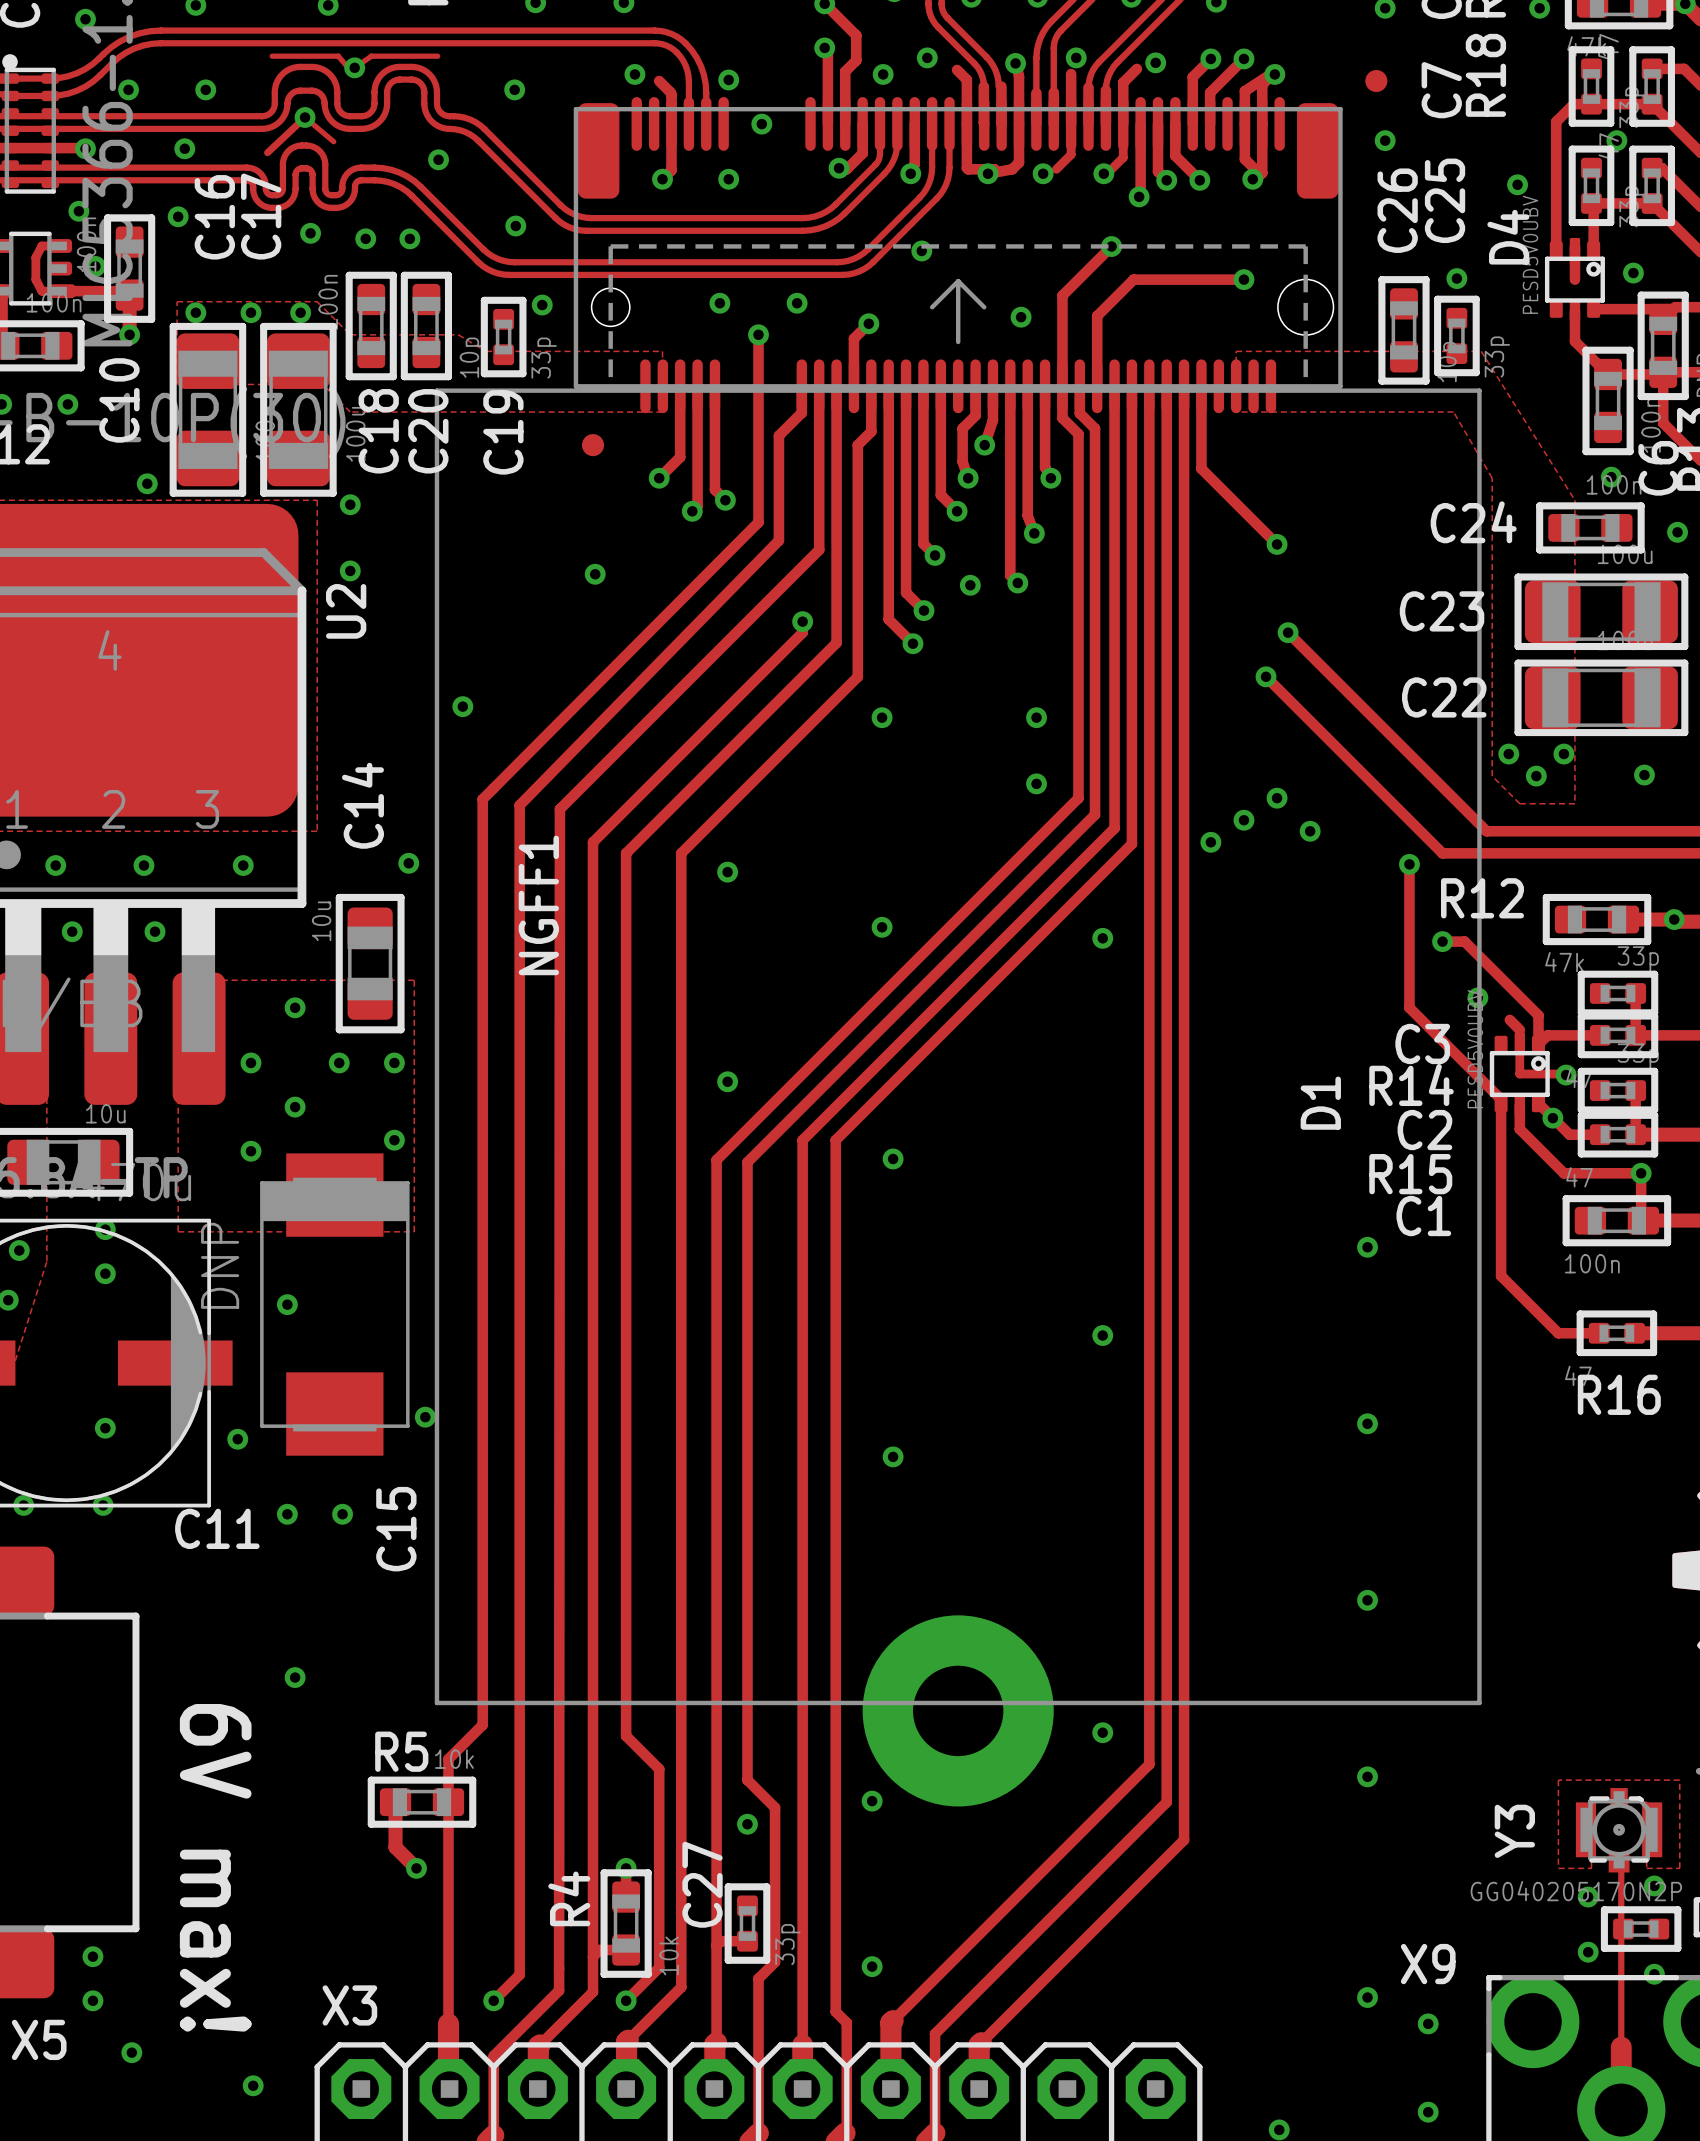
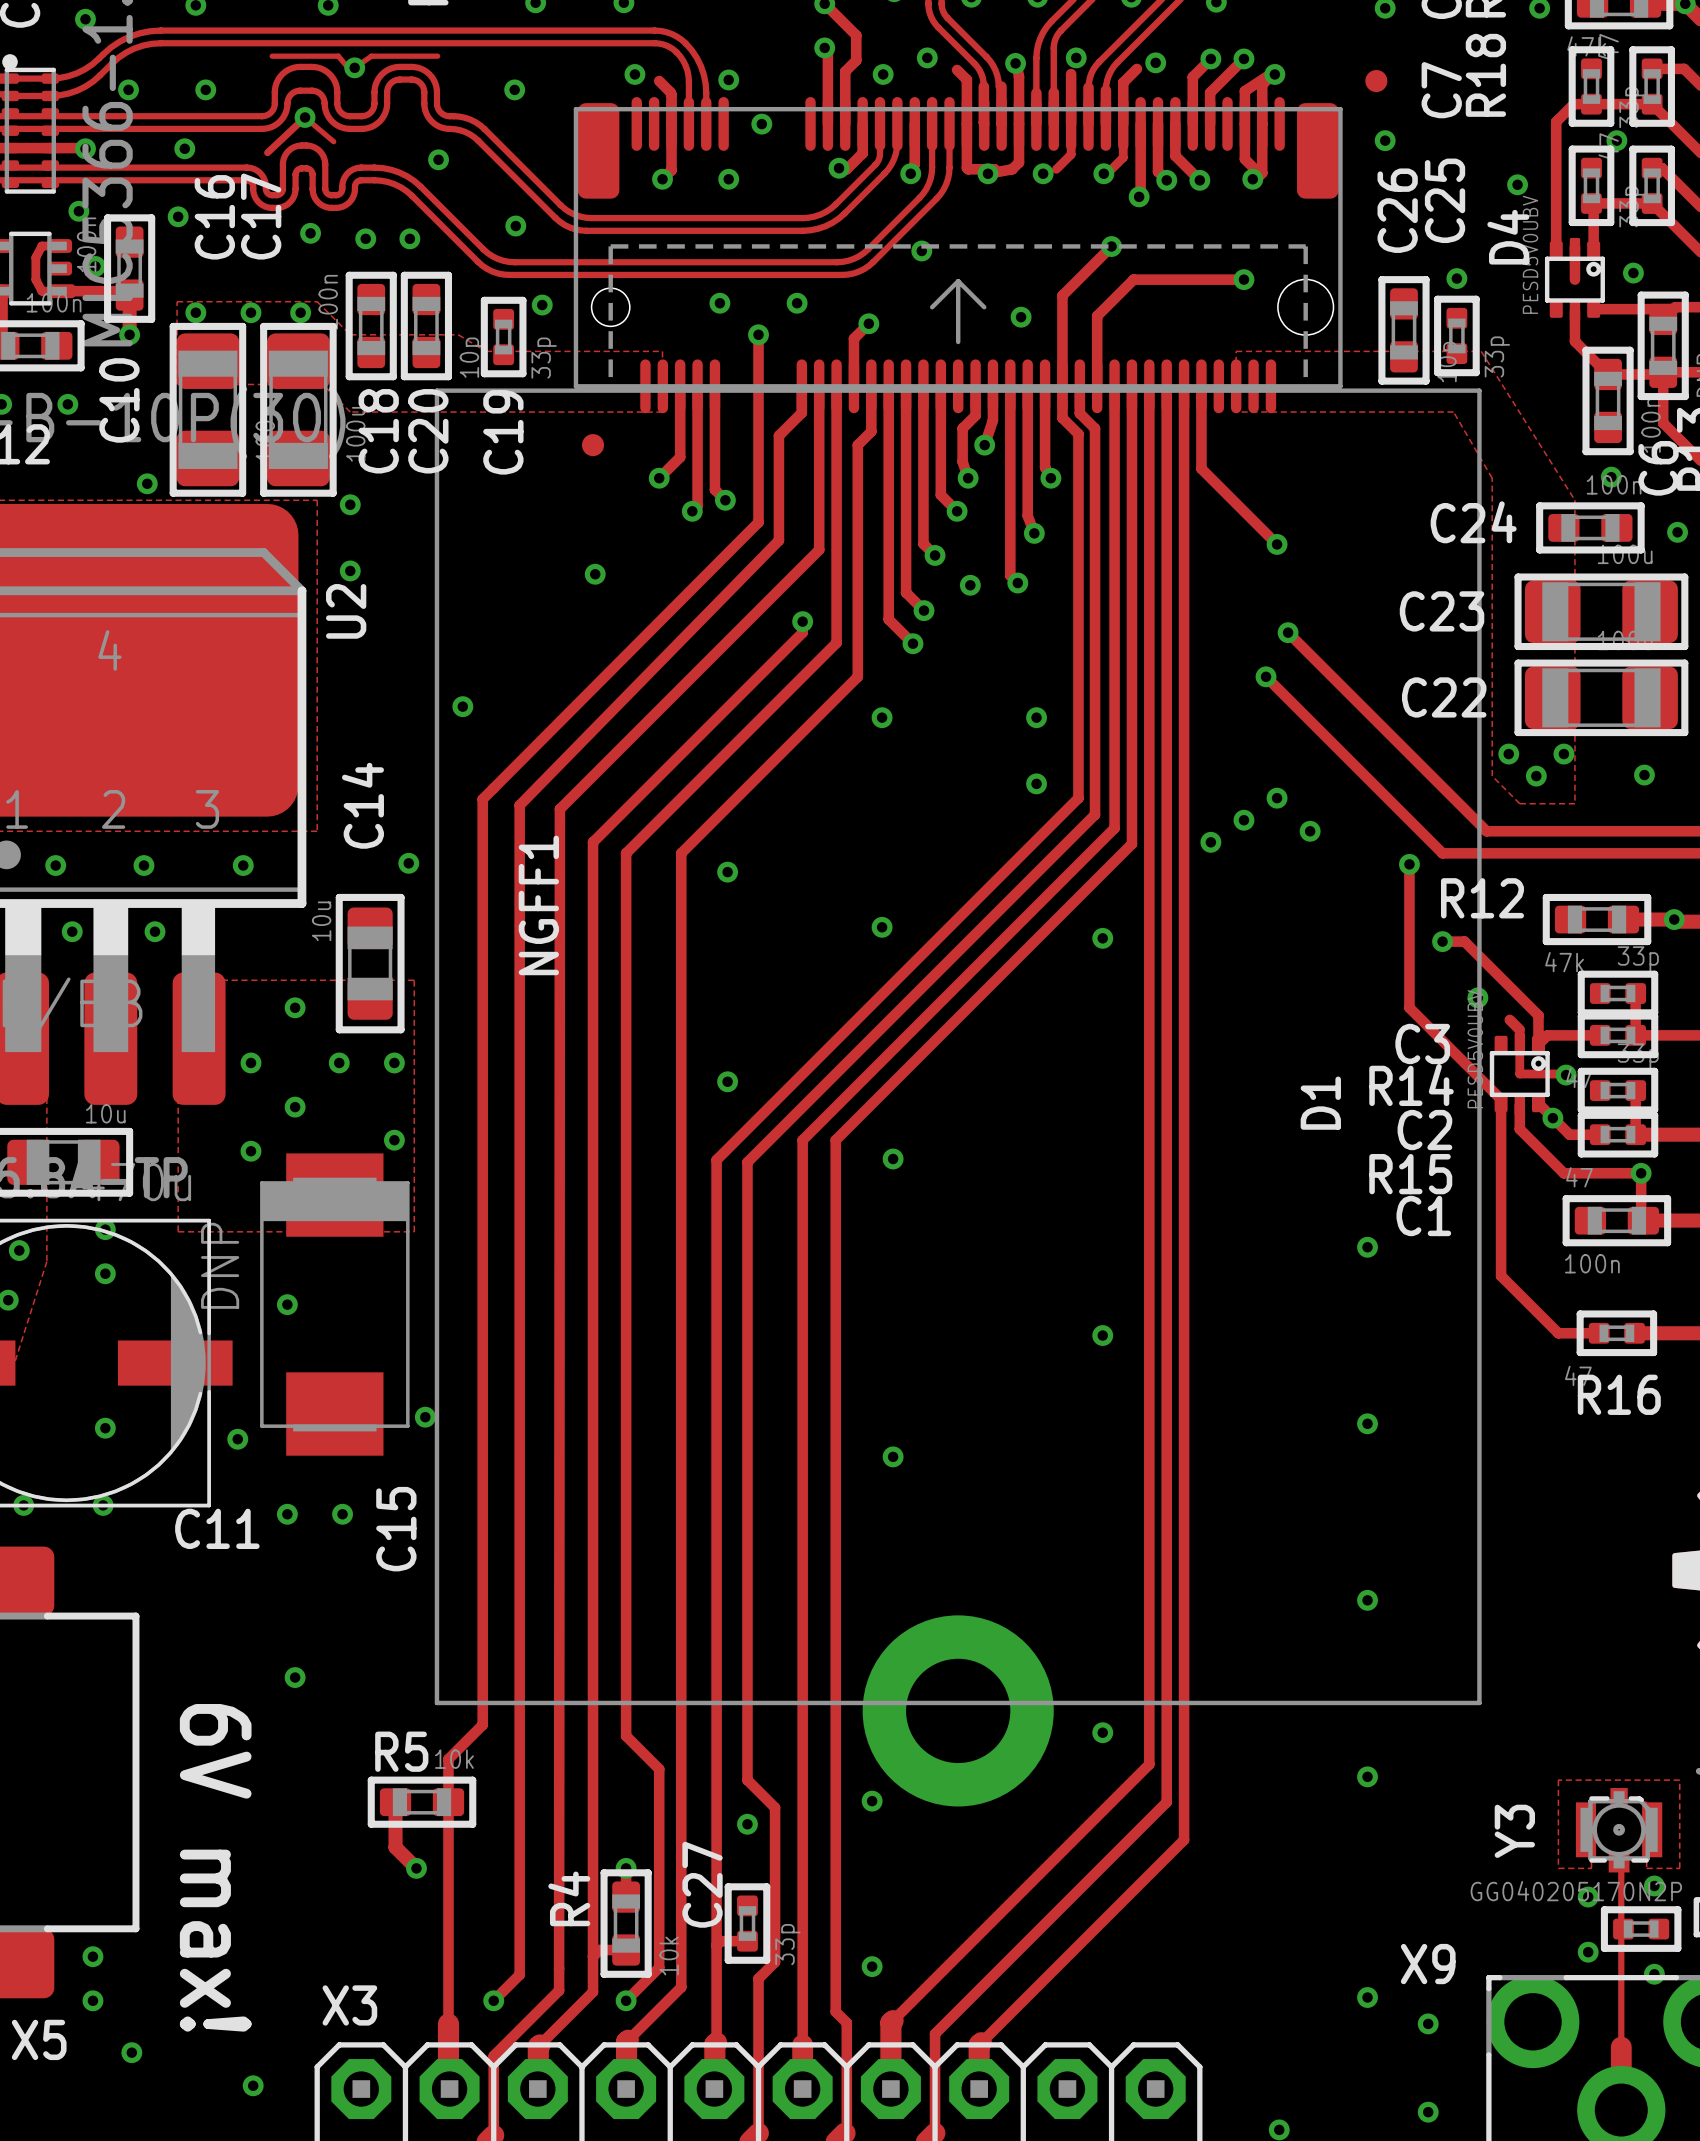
NGFF1 footprint: [434, 97, 1482, 1807] -> [434, 97, 1482, 1807]

